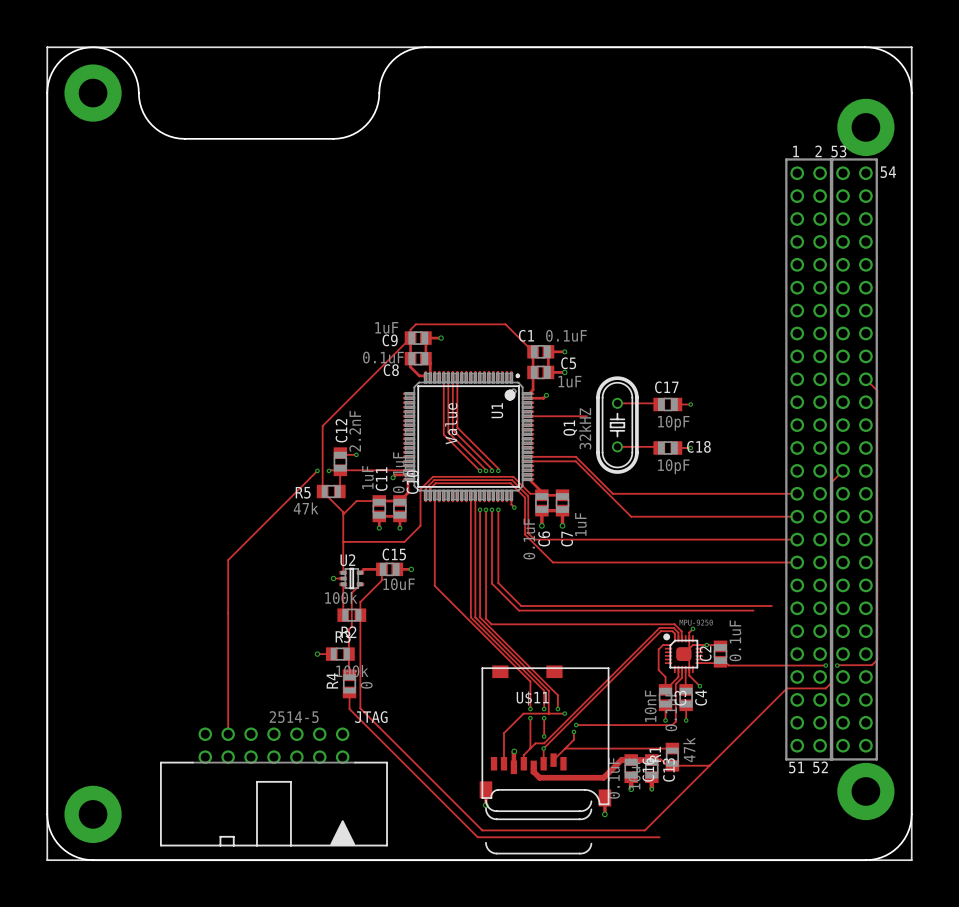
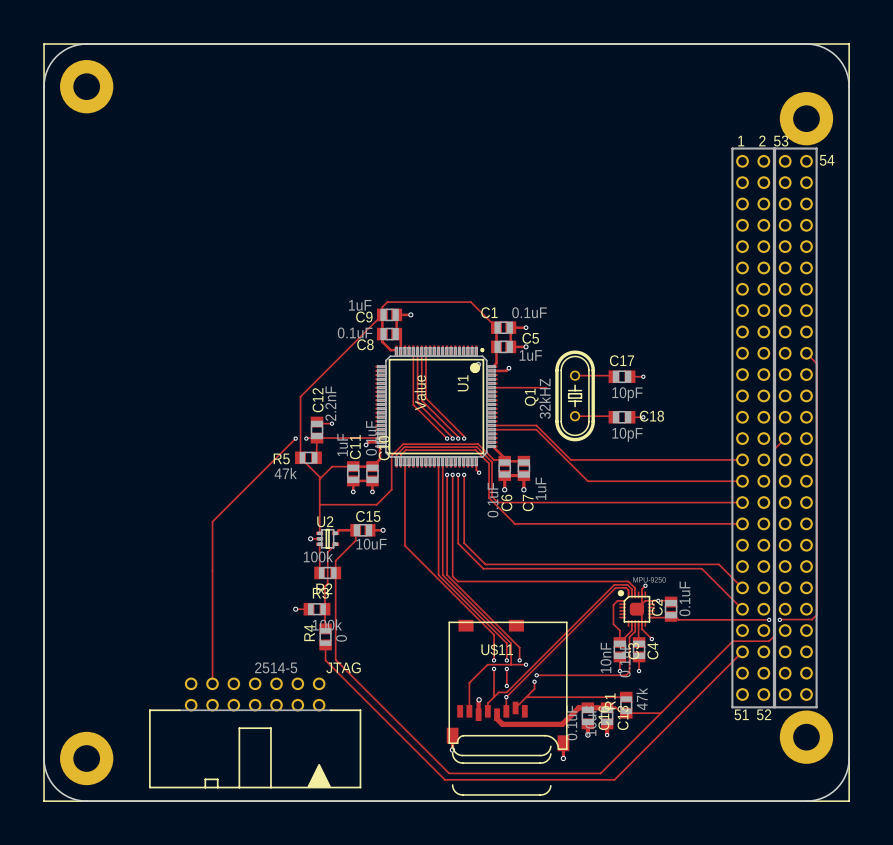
part footprint: [46, 46, 913, 861] -> [43, 43, 850, 802]
board edge: none -> (86, 44) (805, 44) (824, 47) (836, 56) (846, 72) (849, 86) (849, 758) (844, 777) (836, 788) (825, 796) (806, 801) (86, 801) (68, 796) (56, 788) (48, 777) (44, 758) (44, 86) (48, 68) (56, 56) (68, 48) (86, 44)
track: none -> (718, 564) (742, 587)
track: none -> (701, 568) (742, 609)
track: none -> (742, 651) (614, 779)

